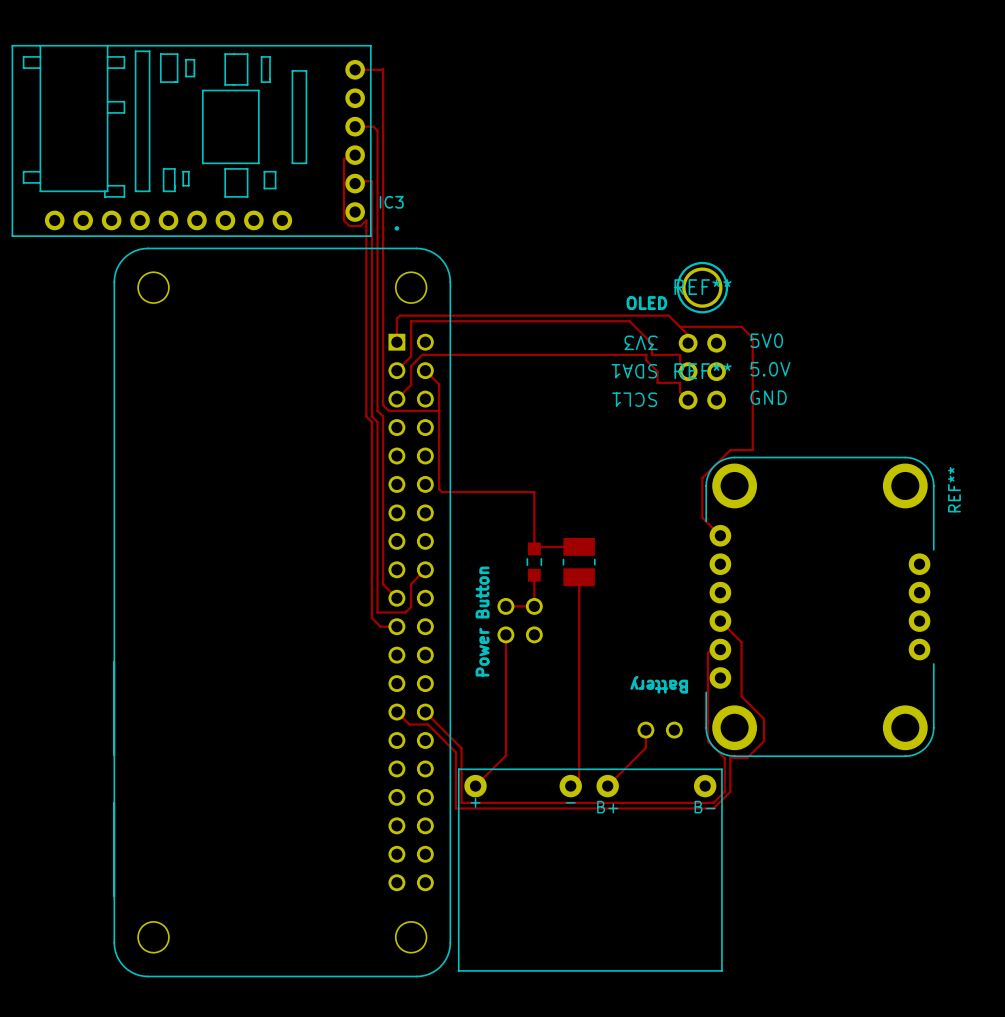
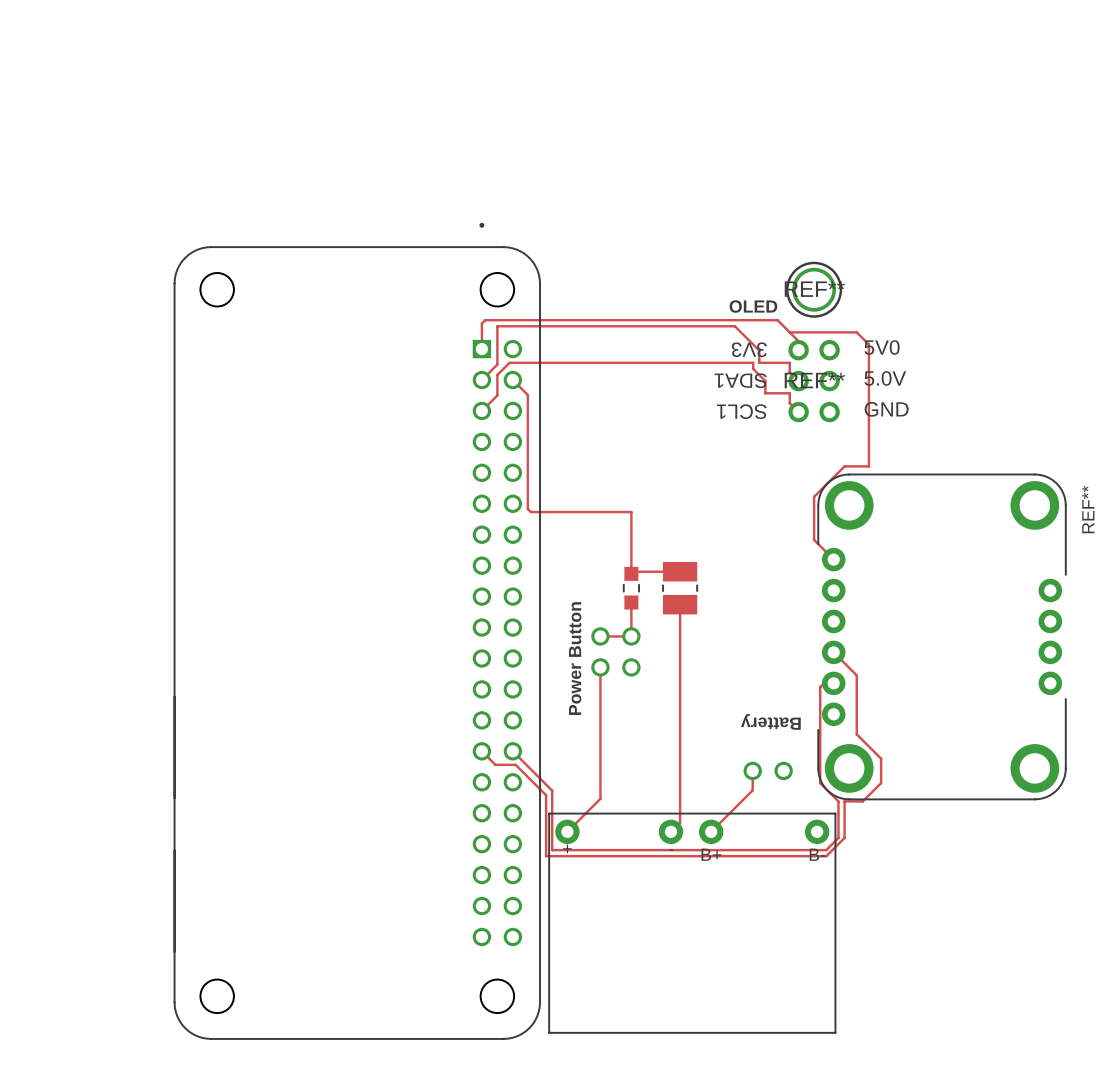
track: (355, 69) (383, 69) (383, 405) (388, 410) (439, 410) -> none
track: (355, 126) (373, 126) (377, 130) (377, 410) (383, 416) (383, 584) (396, 598) -> none
IC3: (191, 140) -> none
track: (355, 155) (351, 158) (343, 158) (343, 220) (349, 226) (360, 226) (366, 220) (366, 416) (371, 422) (371, 618) (380, 626) (396, 626) -> none
track: (355, 183) (357, 181) (371, 181) (371, 416) (377, 422) (377, 612) (405, 612) (411, 606) (411, 584) (425, 569) -> none

